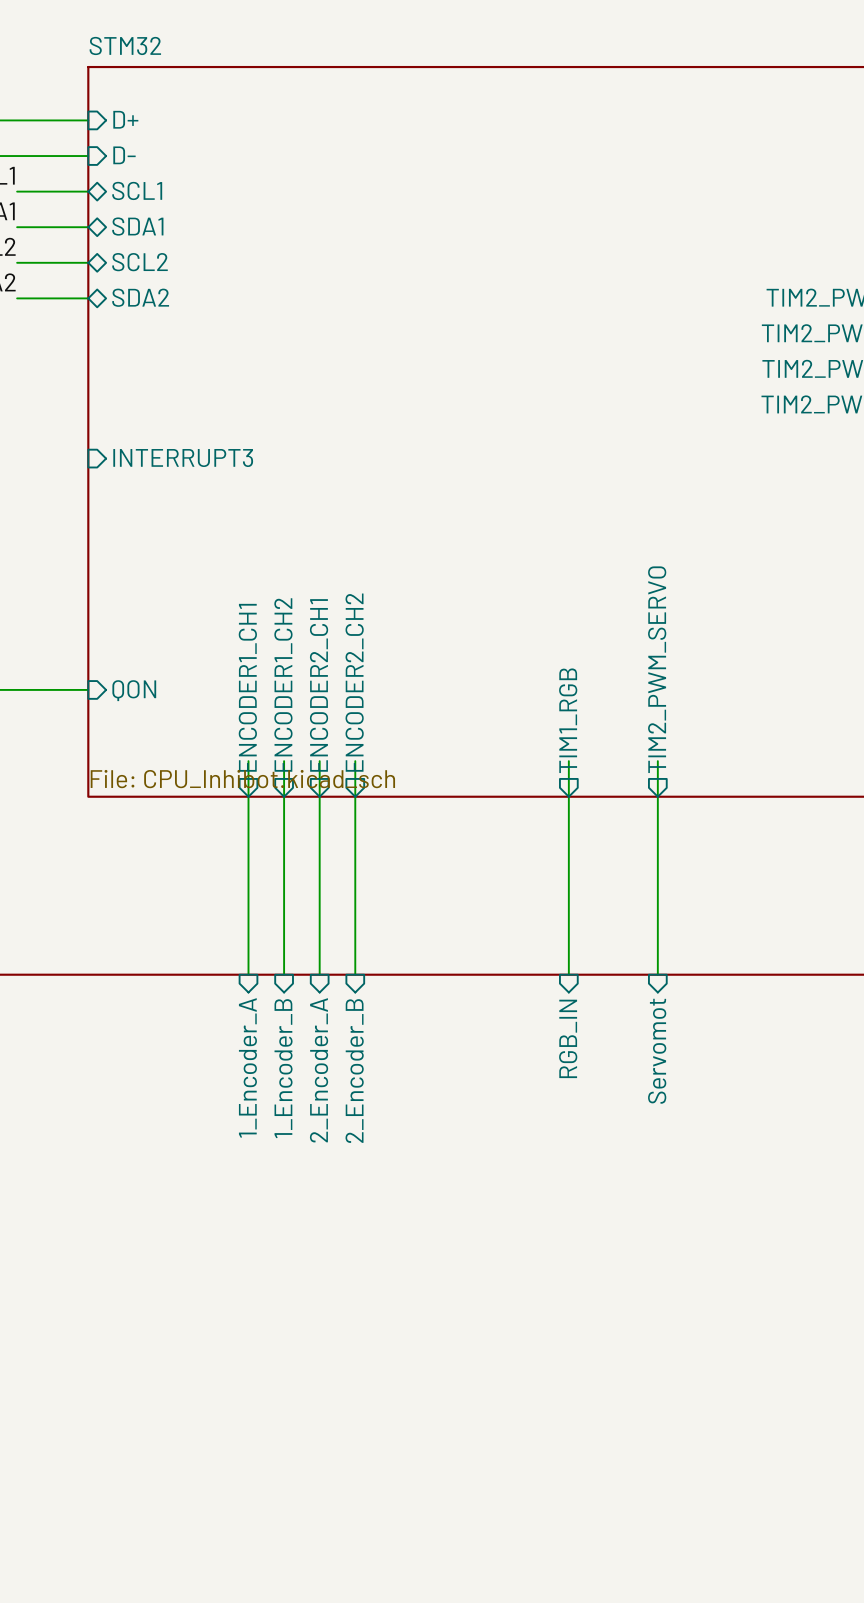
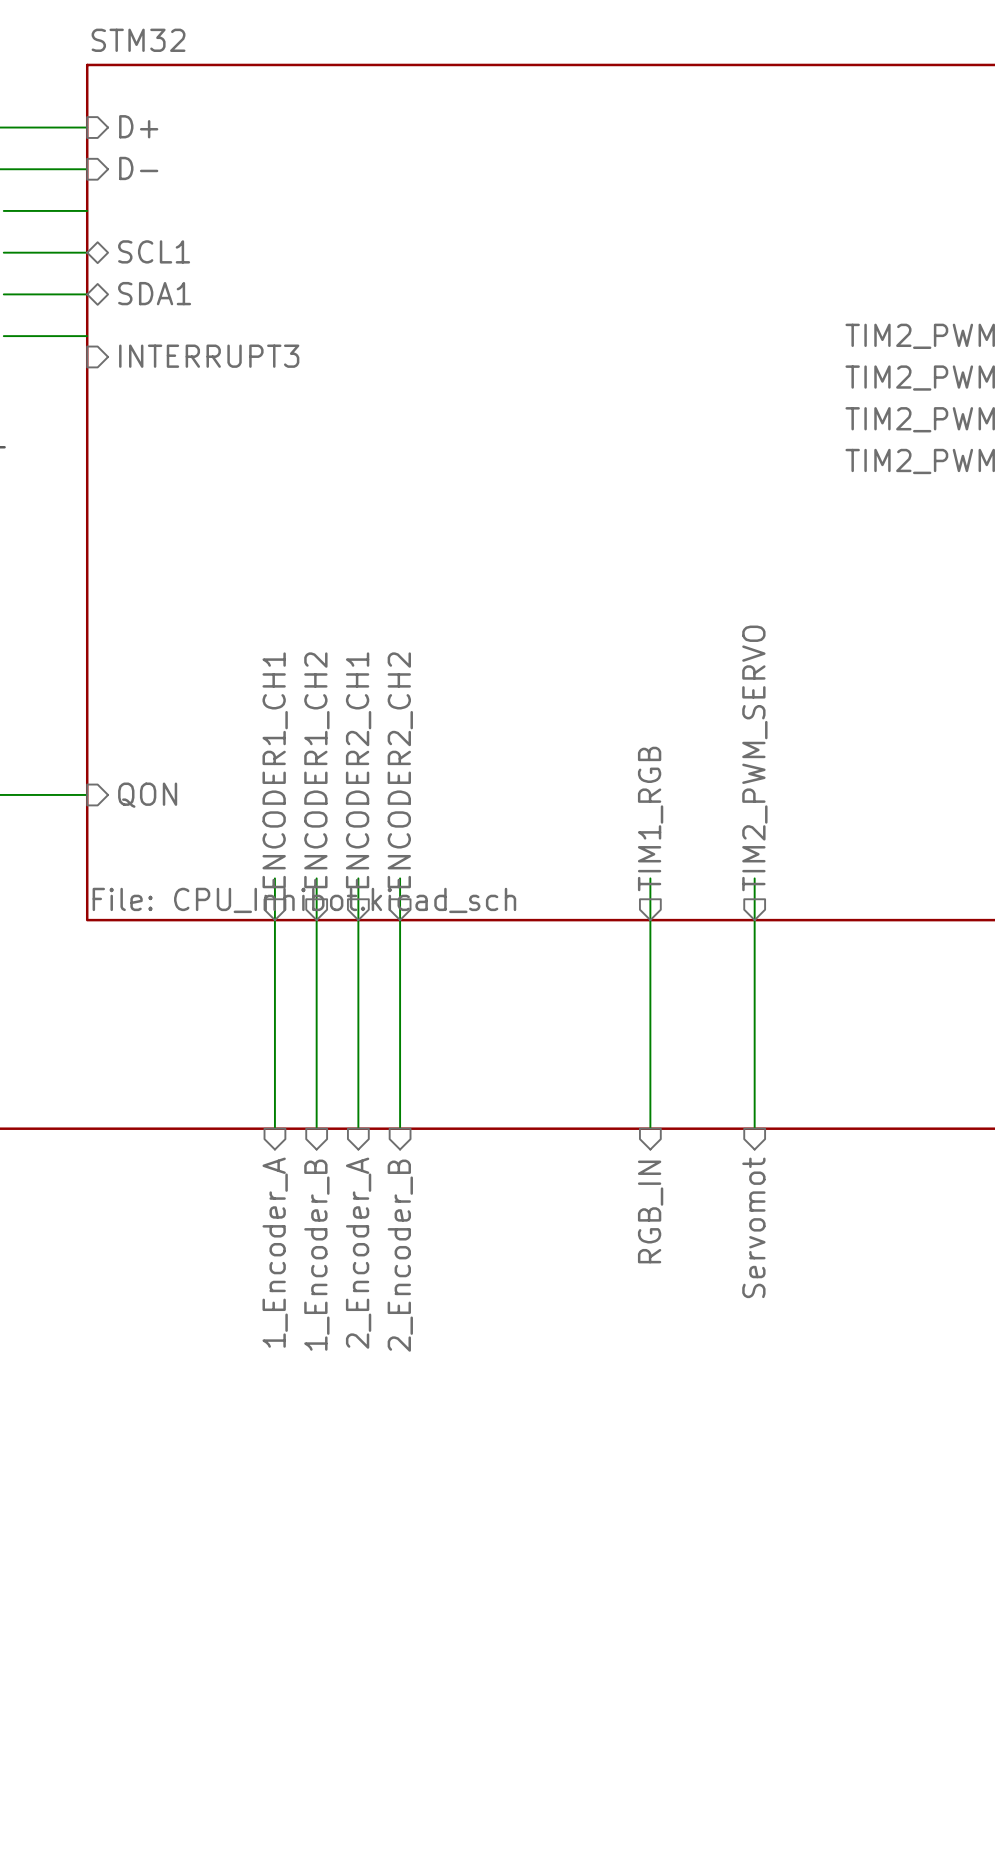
sheet pin: SCL1 (137, 190) -> none
sheet pin: SDA1 (137, 226) -> SCL1 (154, 251)
sheet pin: SCL2 (140, 262) -> SDA1 (154, 293)
sheet pin: SDA2 (140, 297) -> none
sheet pin position: INTERRUPT3 (183, 458) -> INTERRUPT3 (209, 356)

